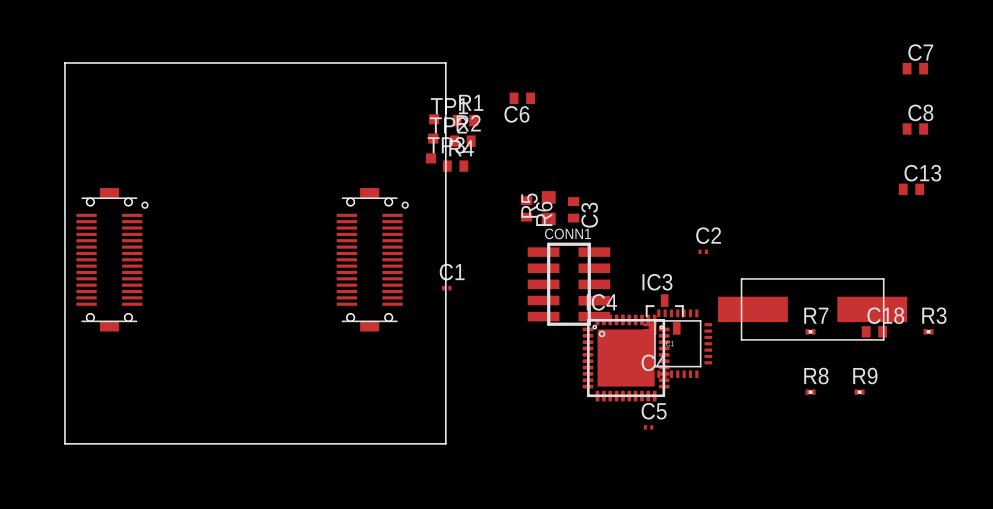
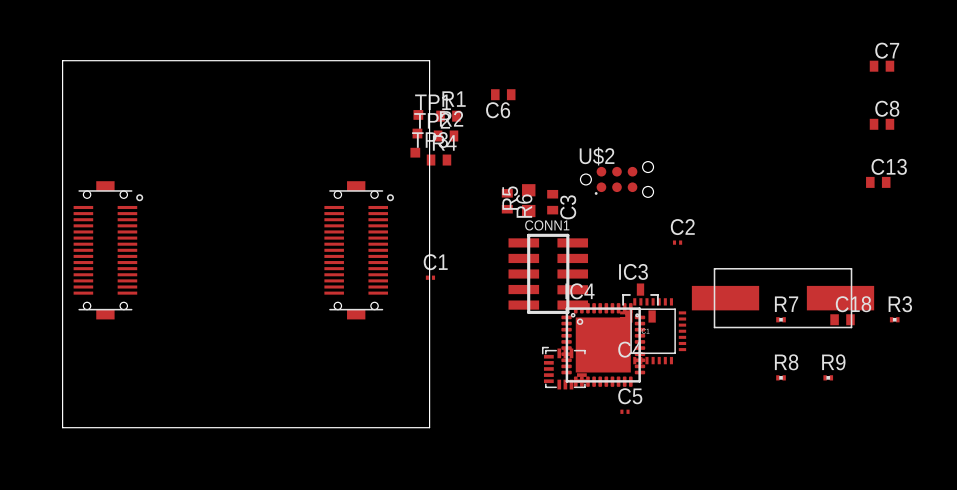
U$2: none -> (616, 179)
part: none -> (564, 368)

